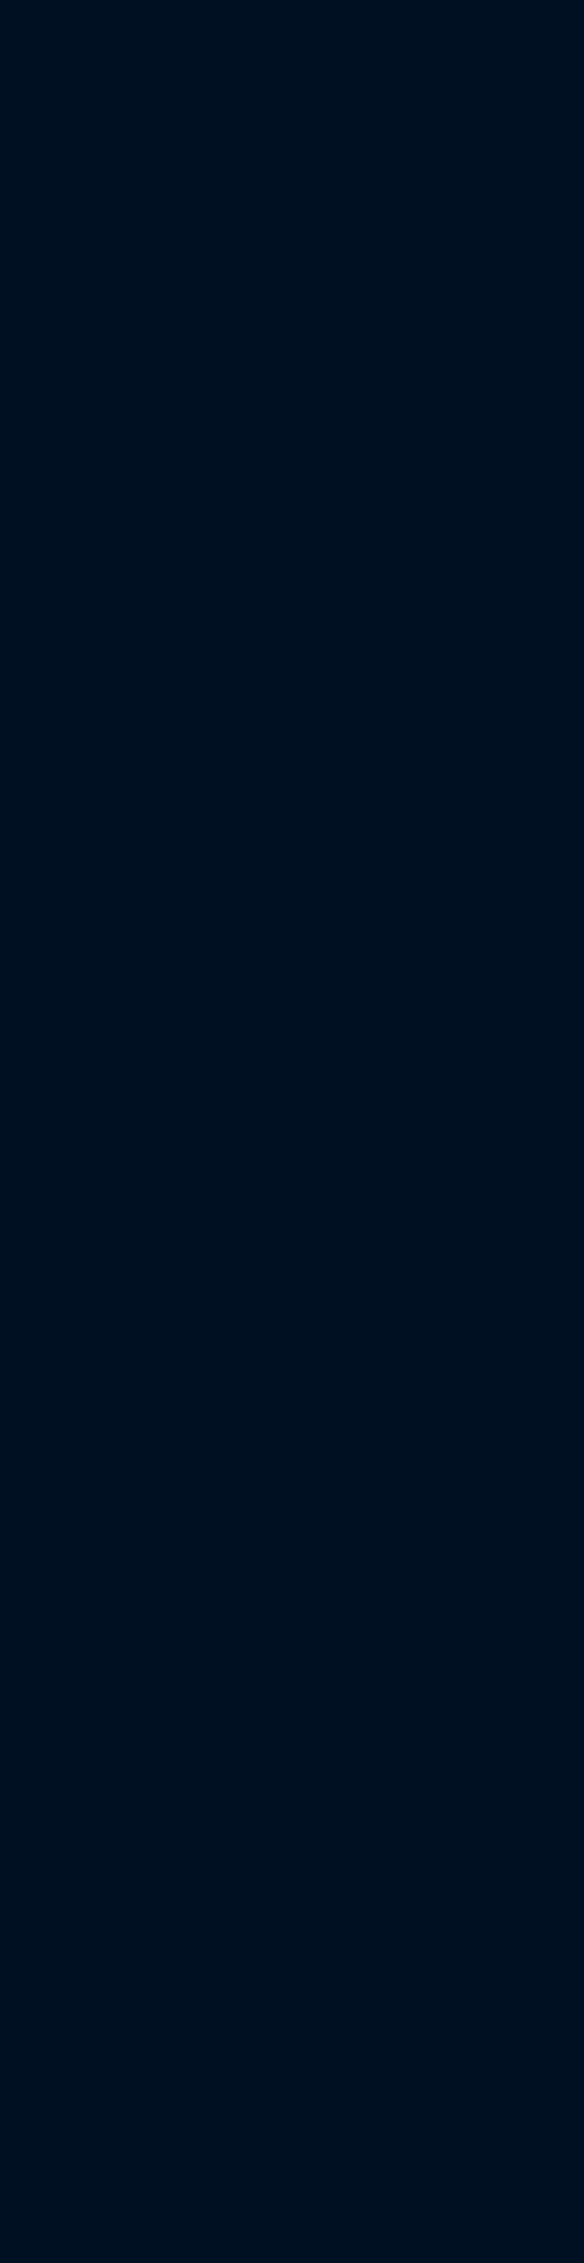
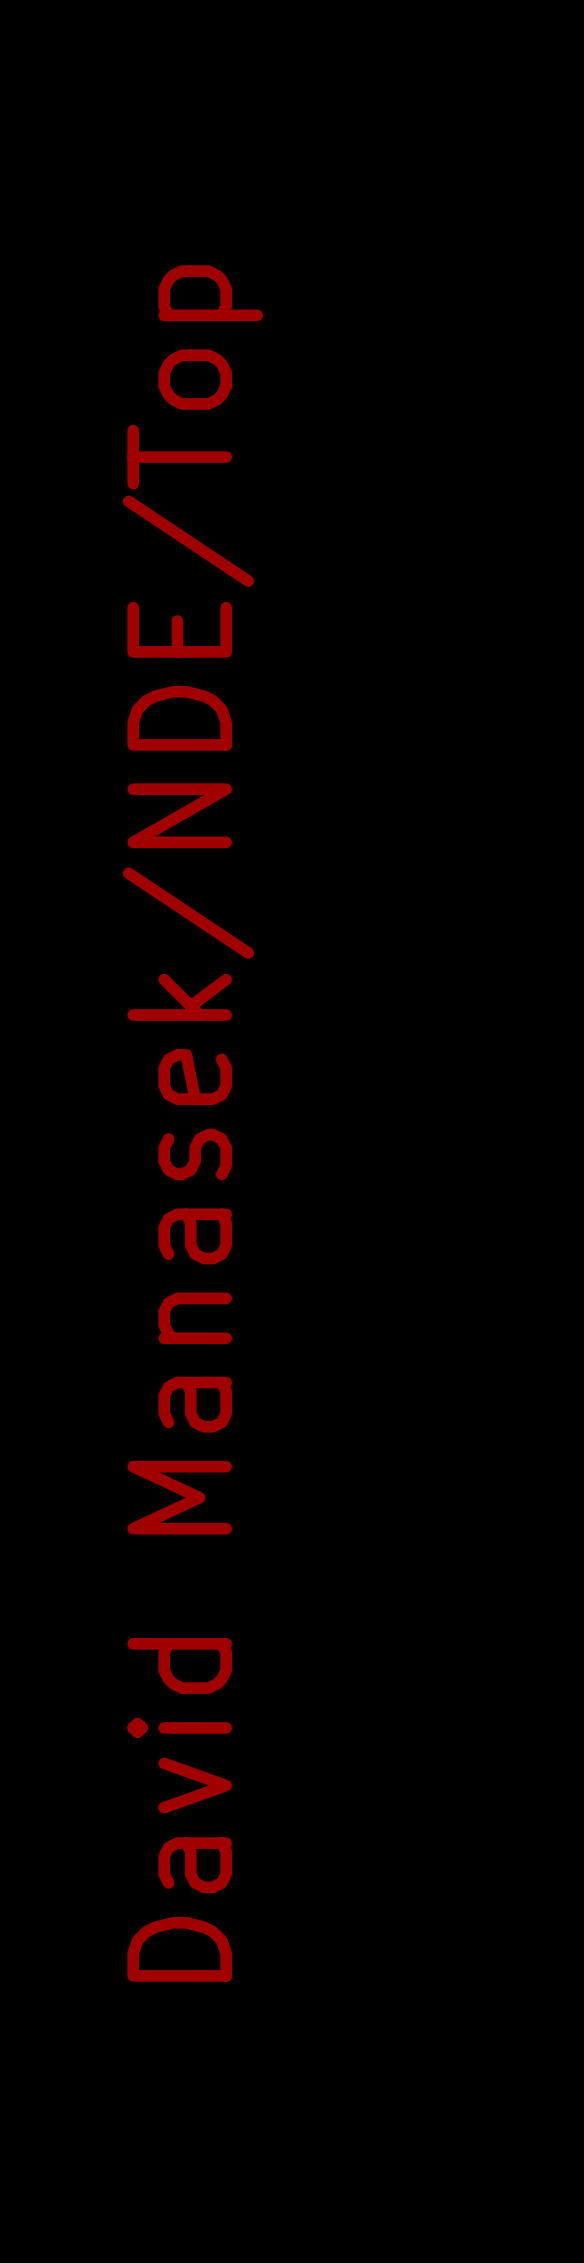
text: none -> David Manasek/NDE/Top (192, 1123)

